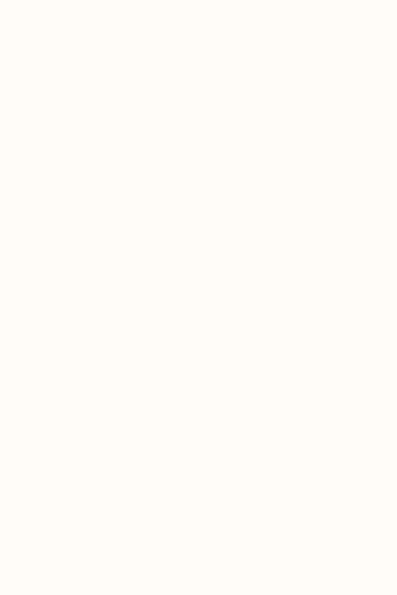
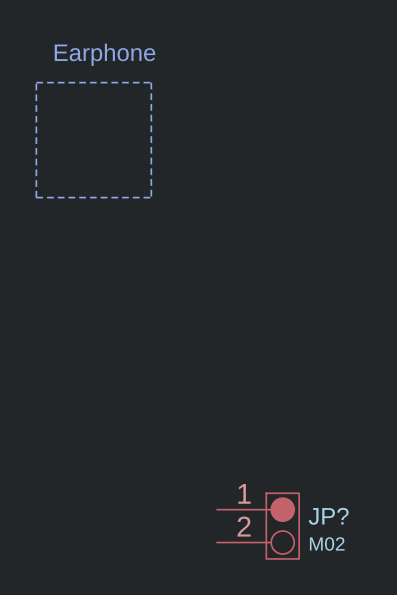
text: none -> Earphone (105, 54)
line: none -> (36, 82) (151, 82) (151, 197) (36, 197) (36, 82)
JP?: none -> M02 (258, 526)

